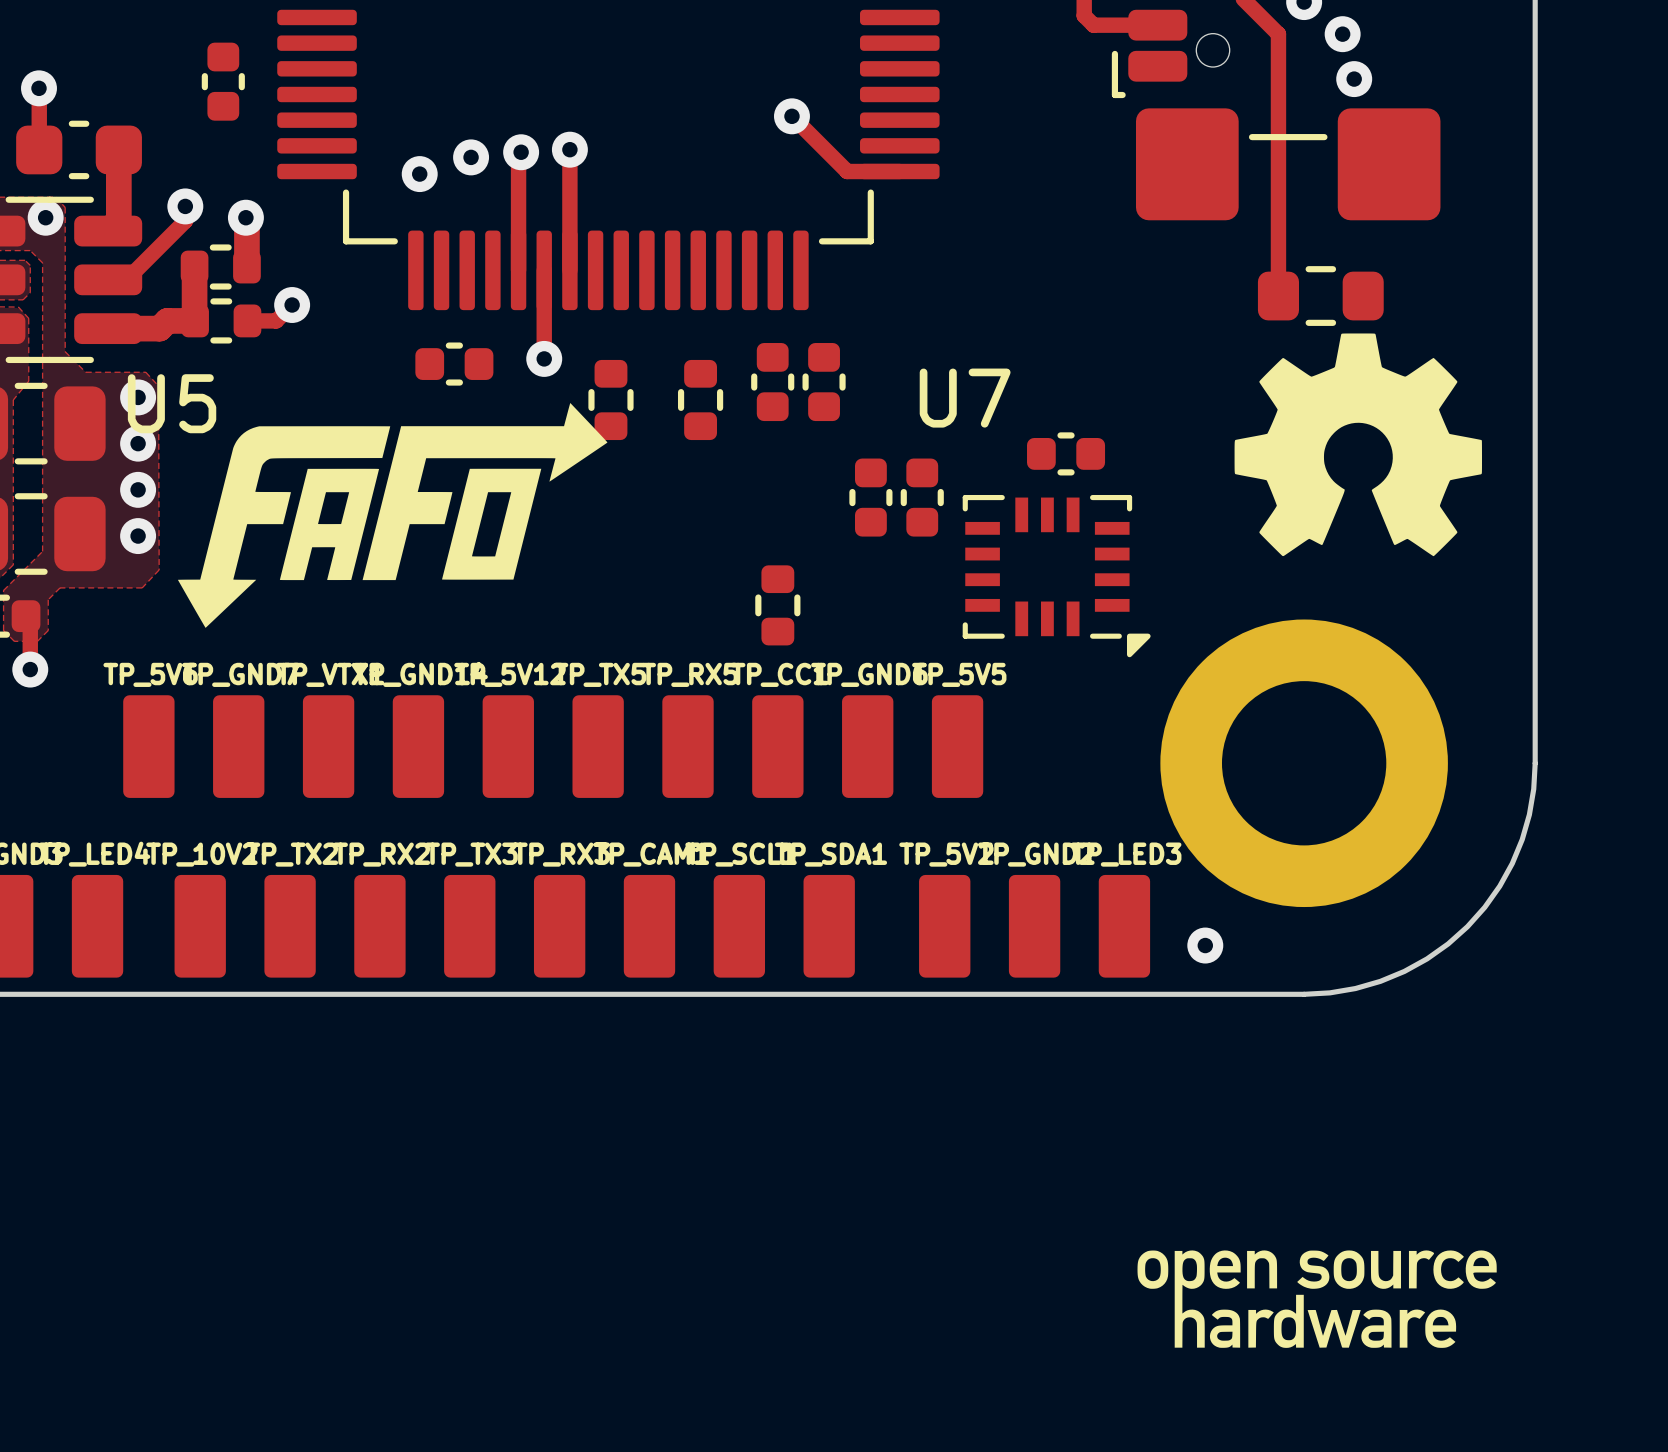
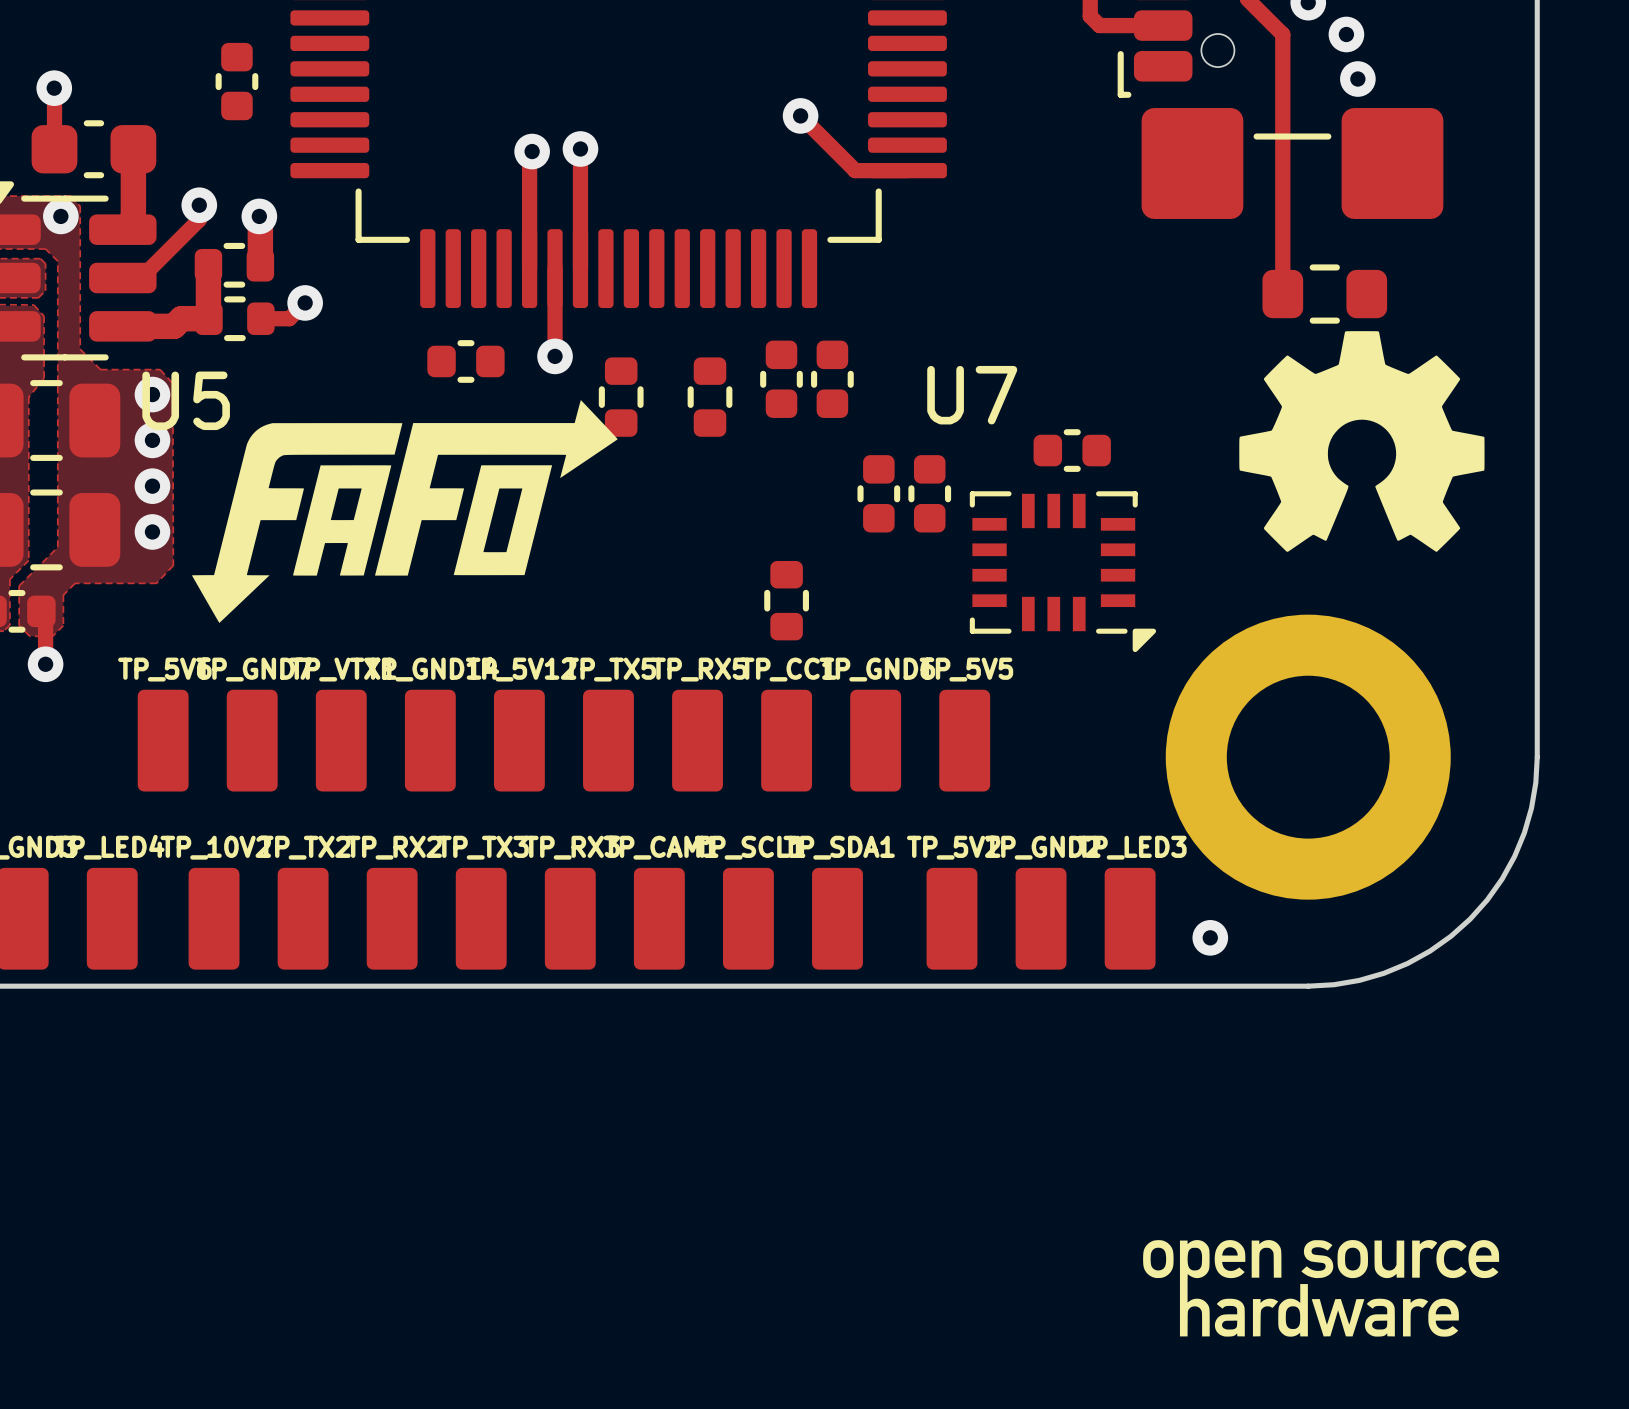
via: (471, 157) -> none
via: (419, 174) -> none

